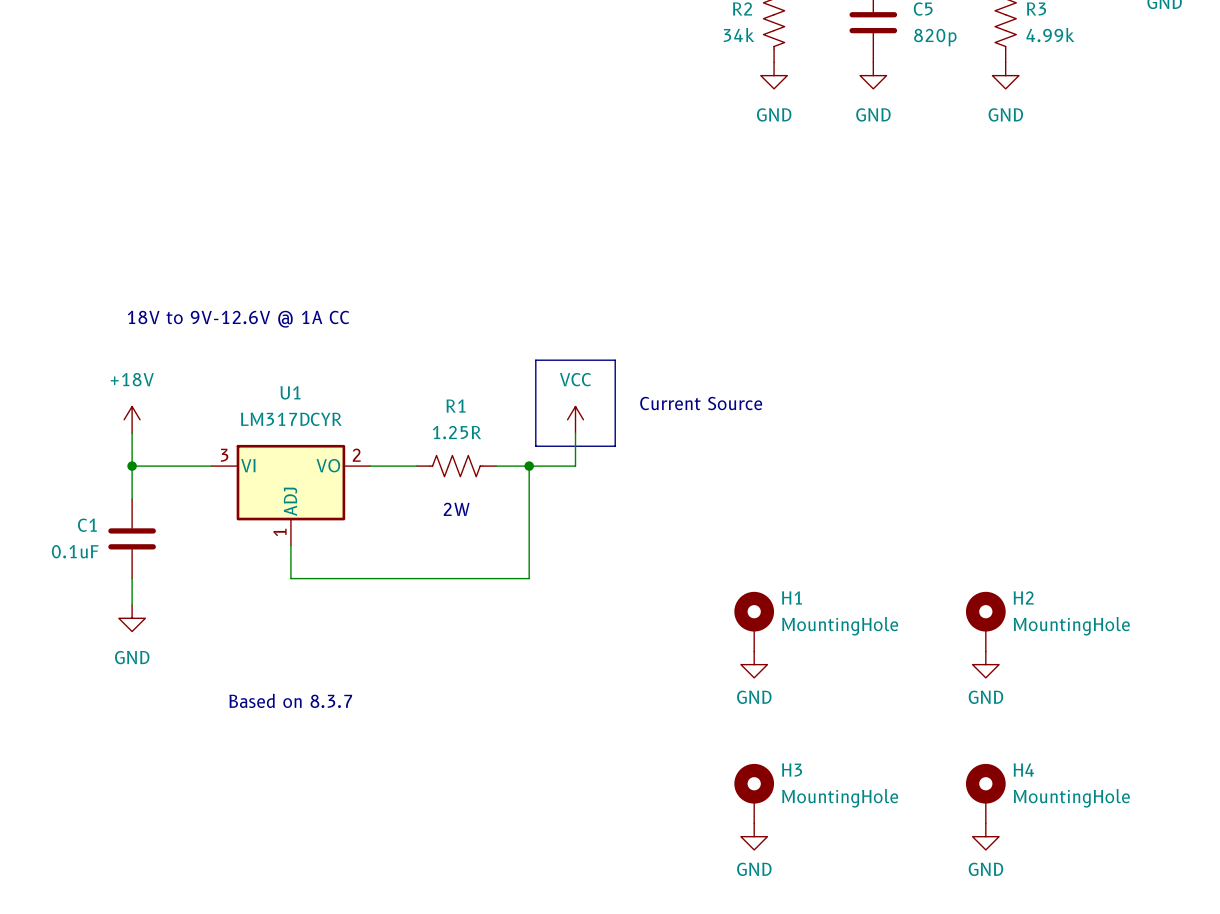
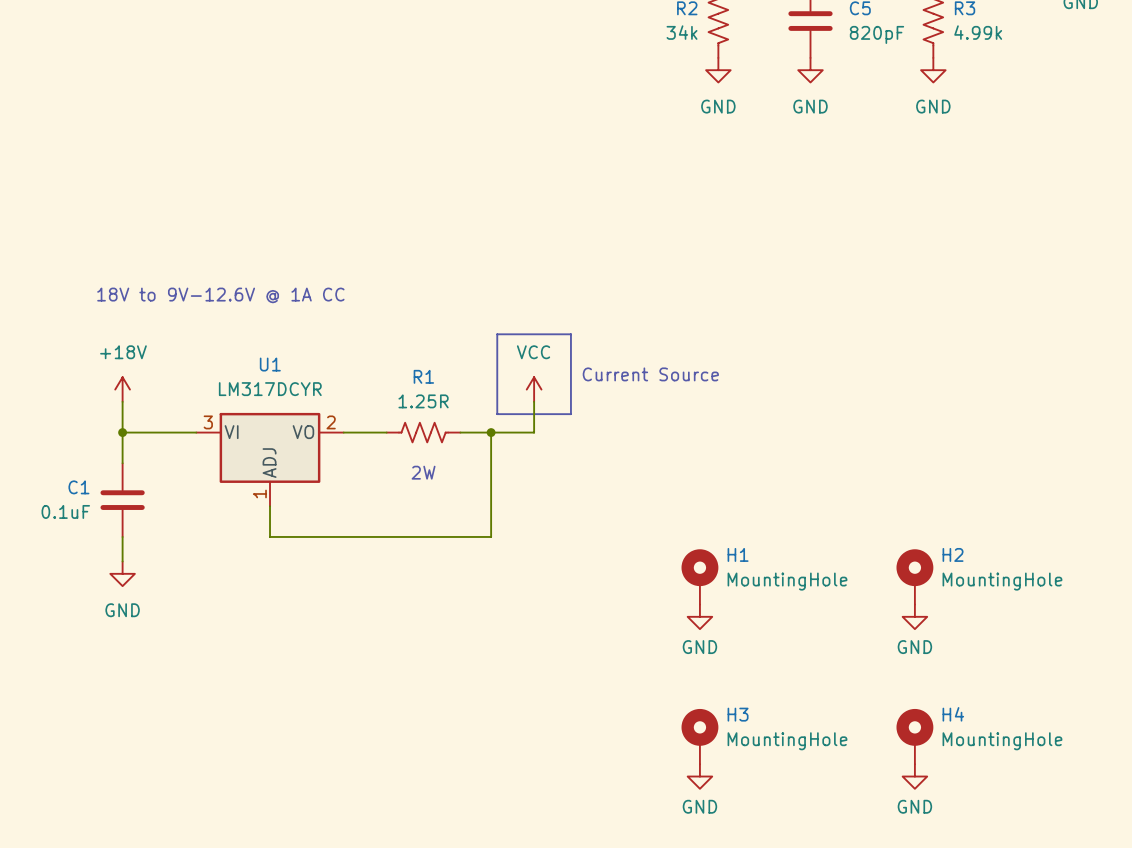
C5 value: 820p (935, 37) -> 820pF (876, 34)
text: Based on 8.3.7 (290, 700) -> none

